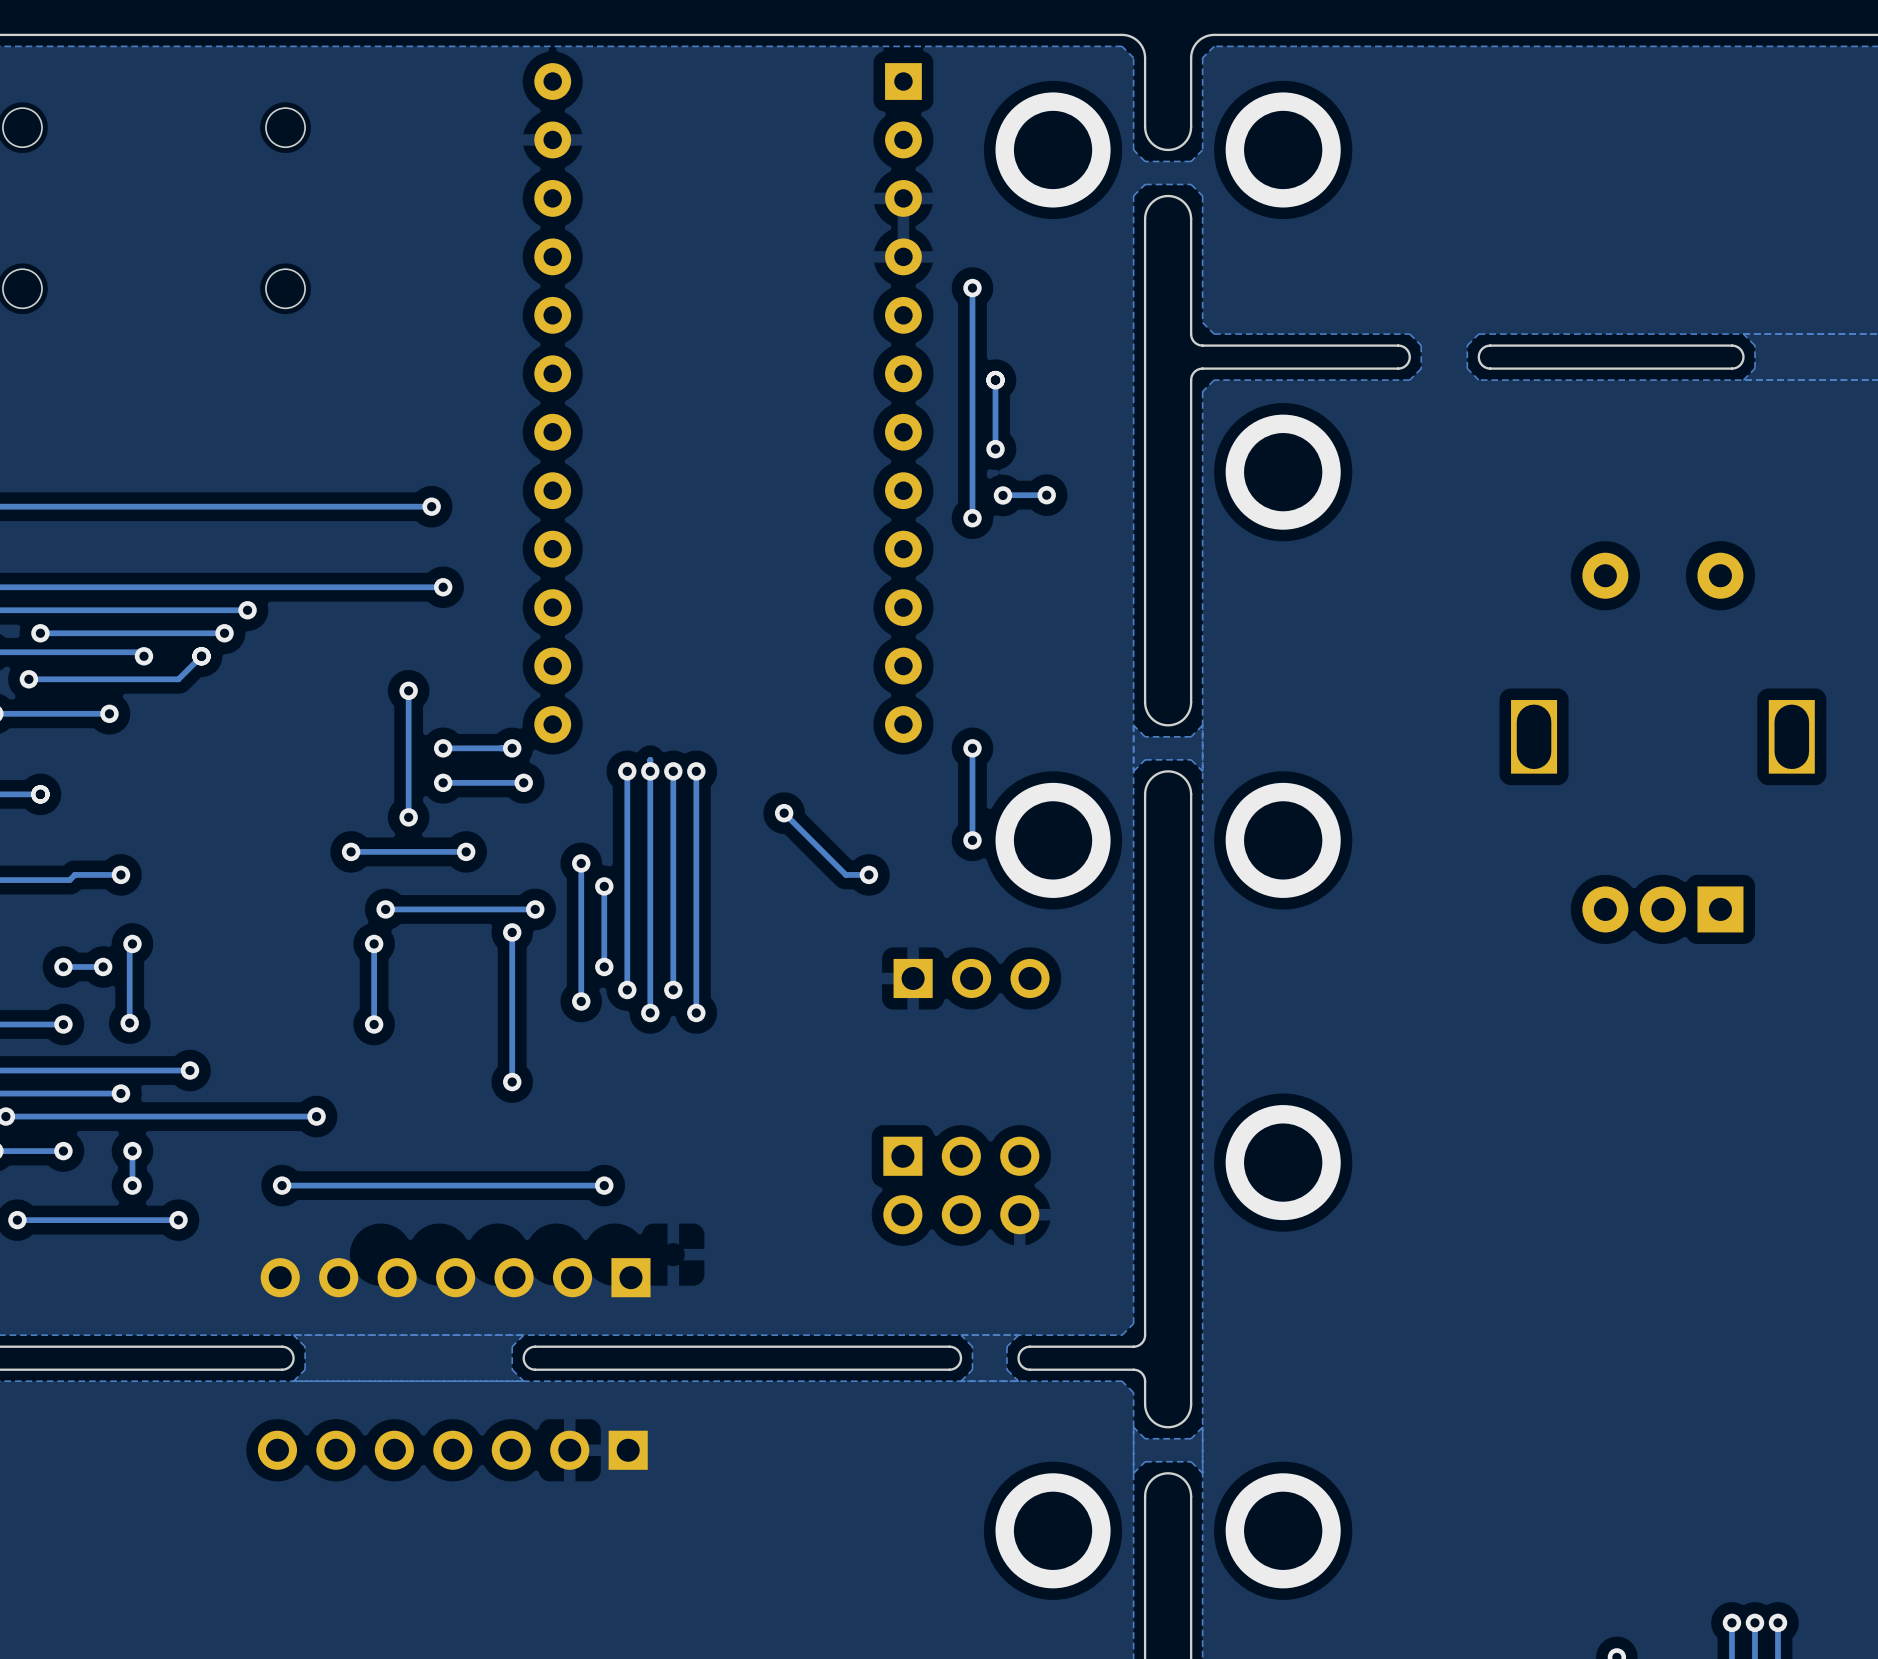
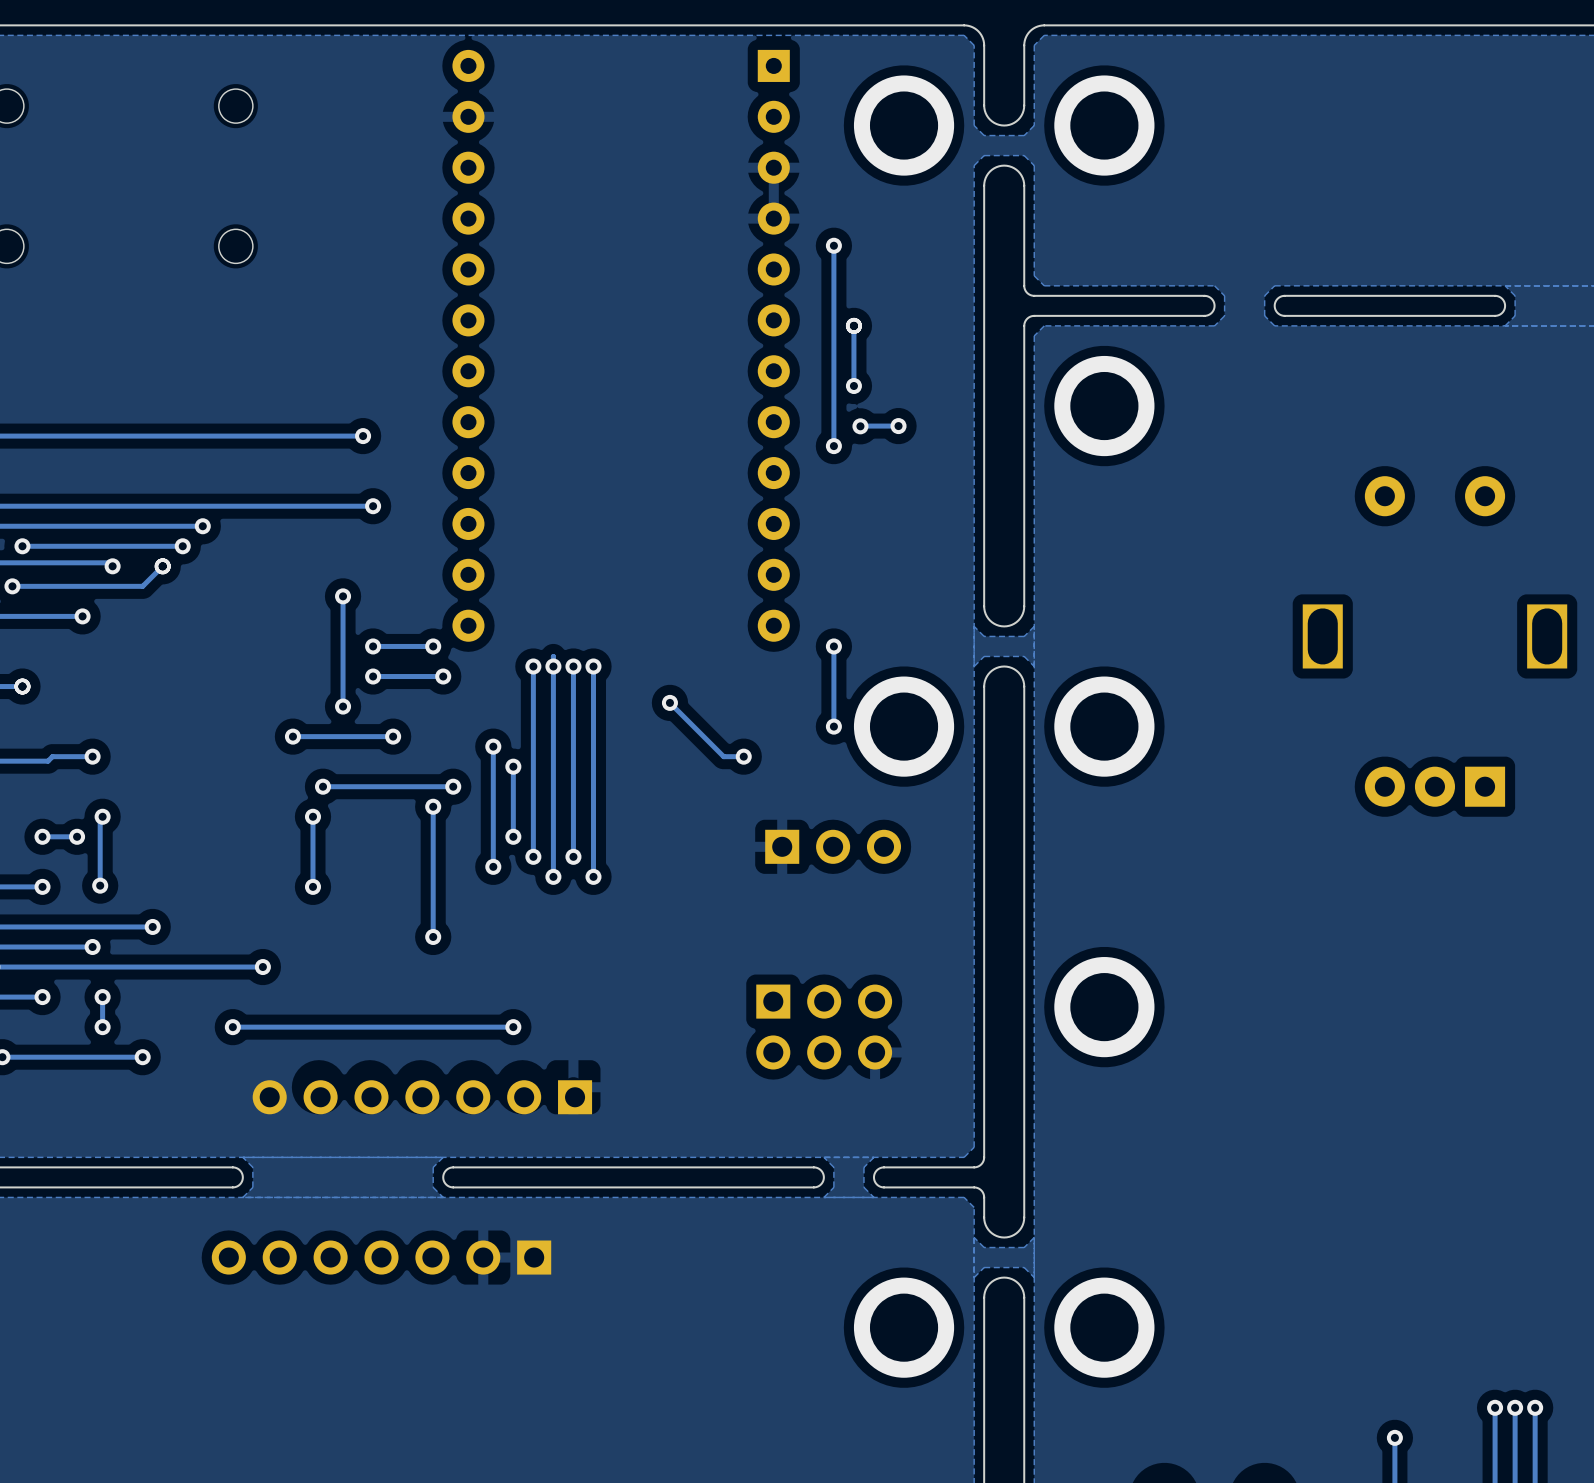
part position: (455, 1277) -> (422, 1097)

